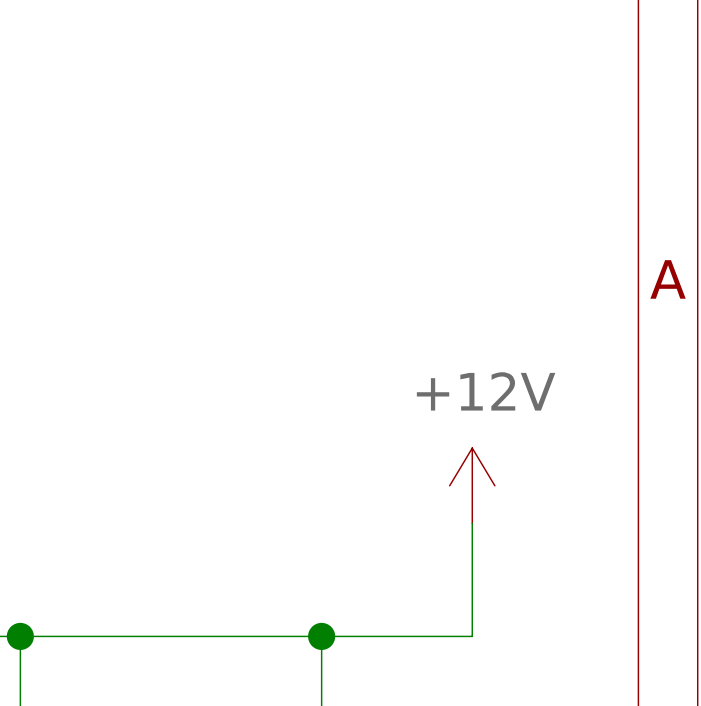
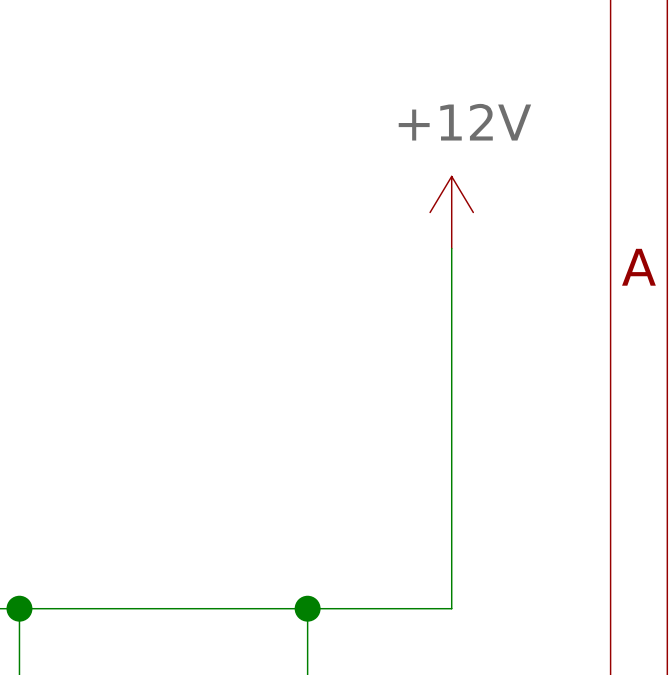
wire: none -> (451, 248) (451, 500)
power symbol position: +12V (472, 485) -> +12V (451, 212)

